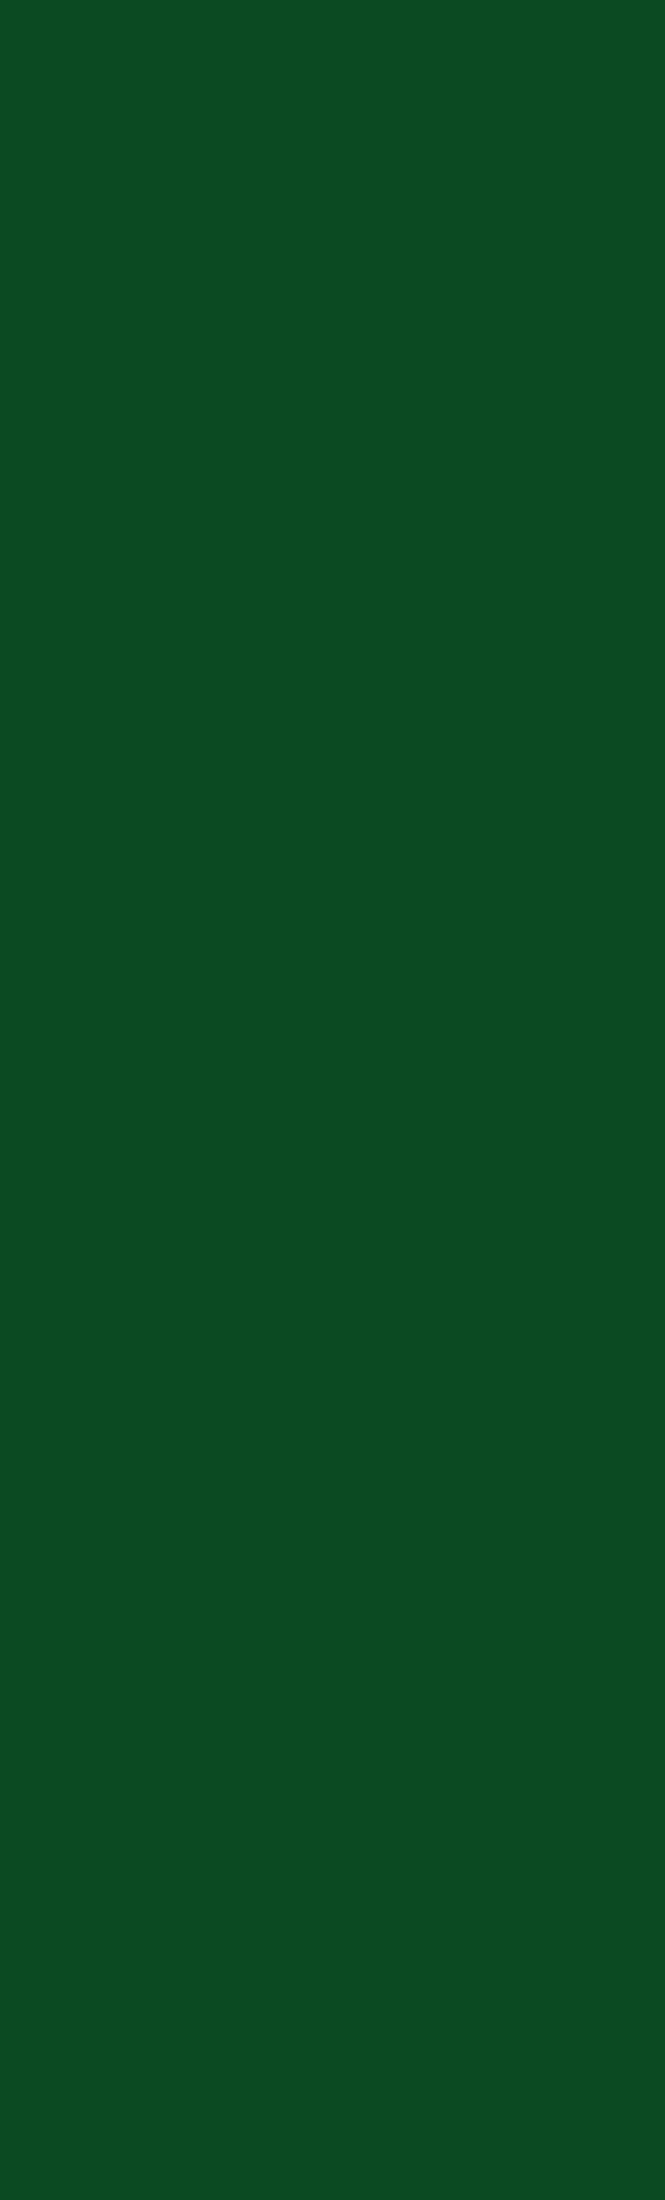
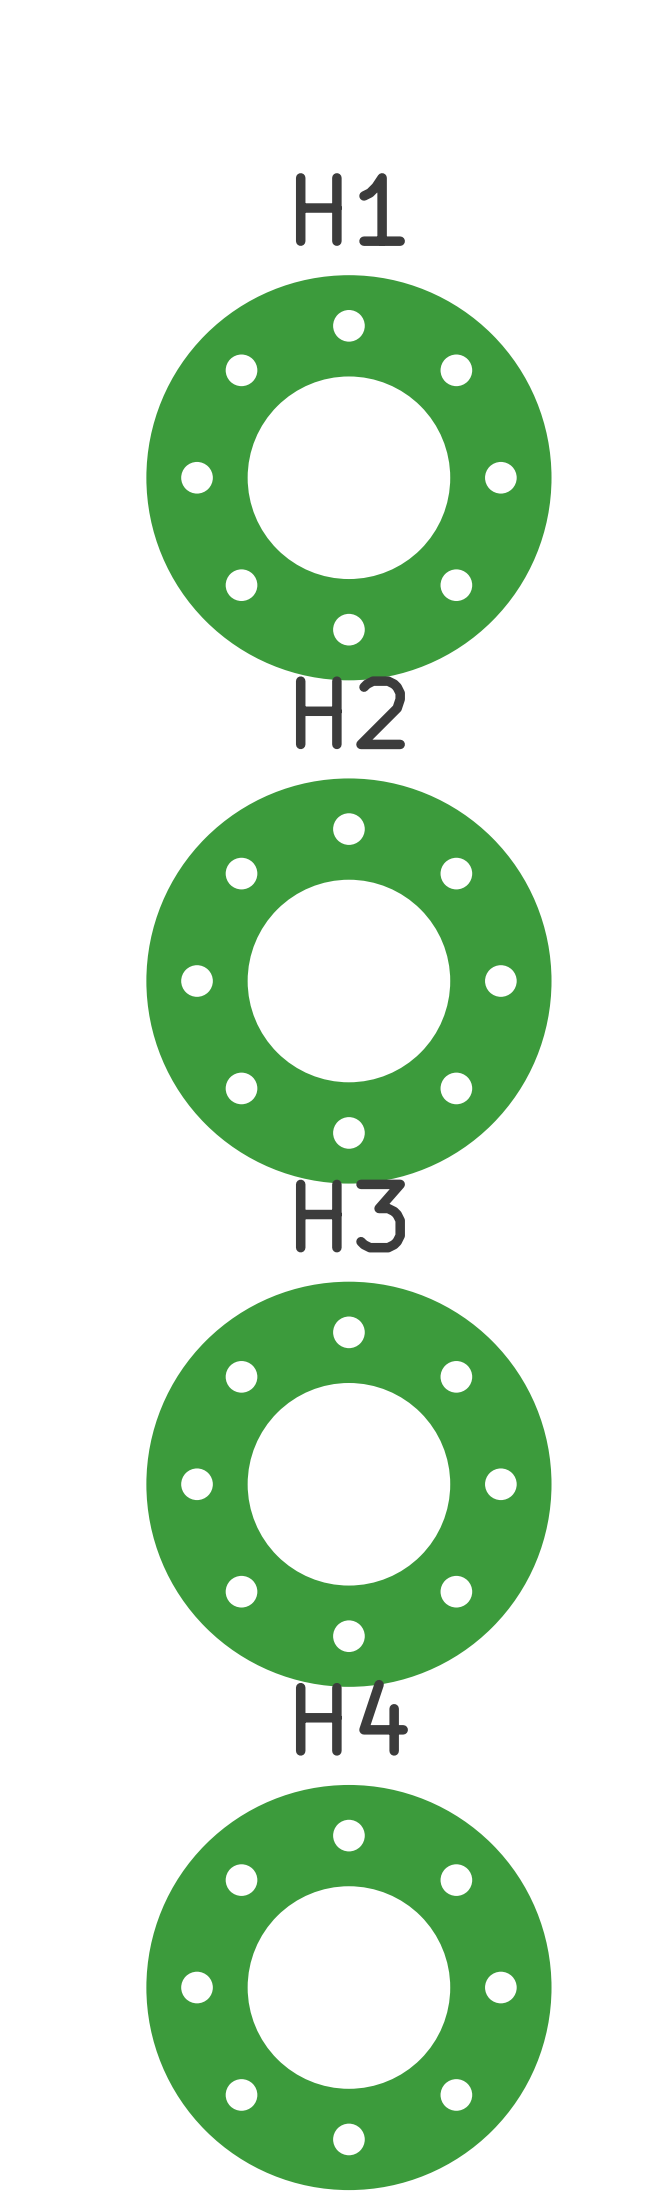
H1: none -> (348, 477)
H2: none -> (348, 981)
H3: none -> (348, 1484)
H4: none -> (348, 1987)

